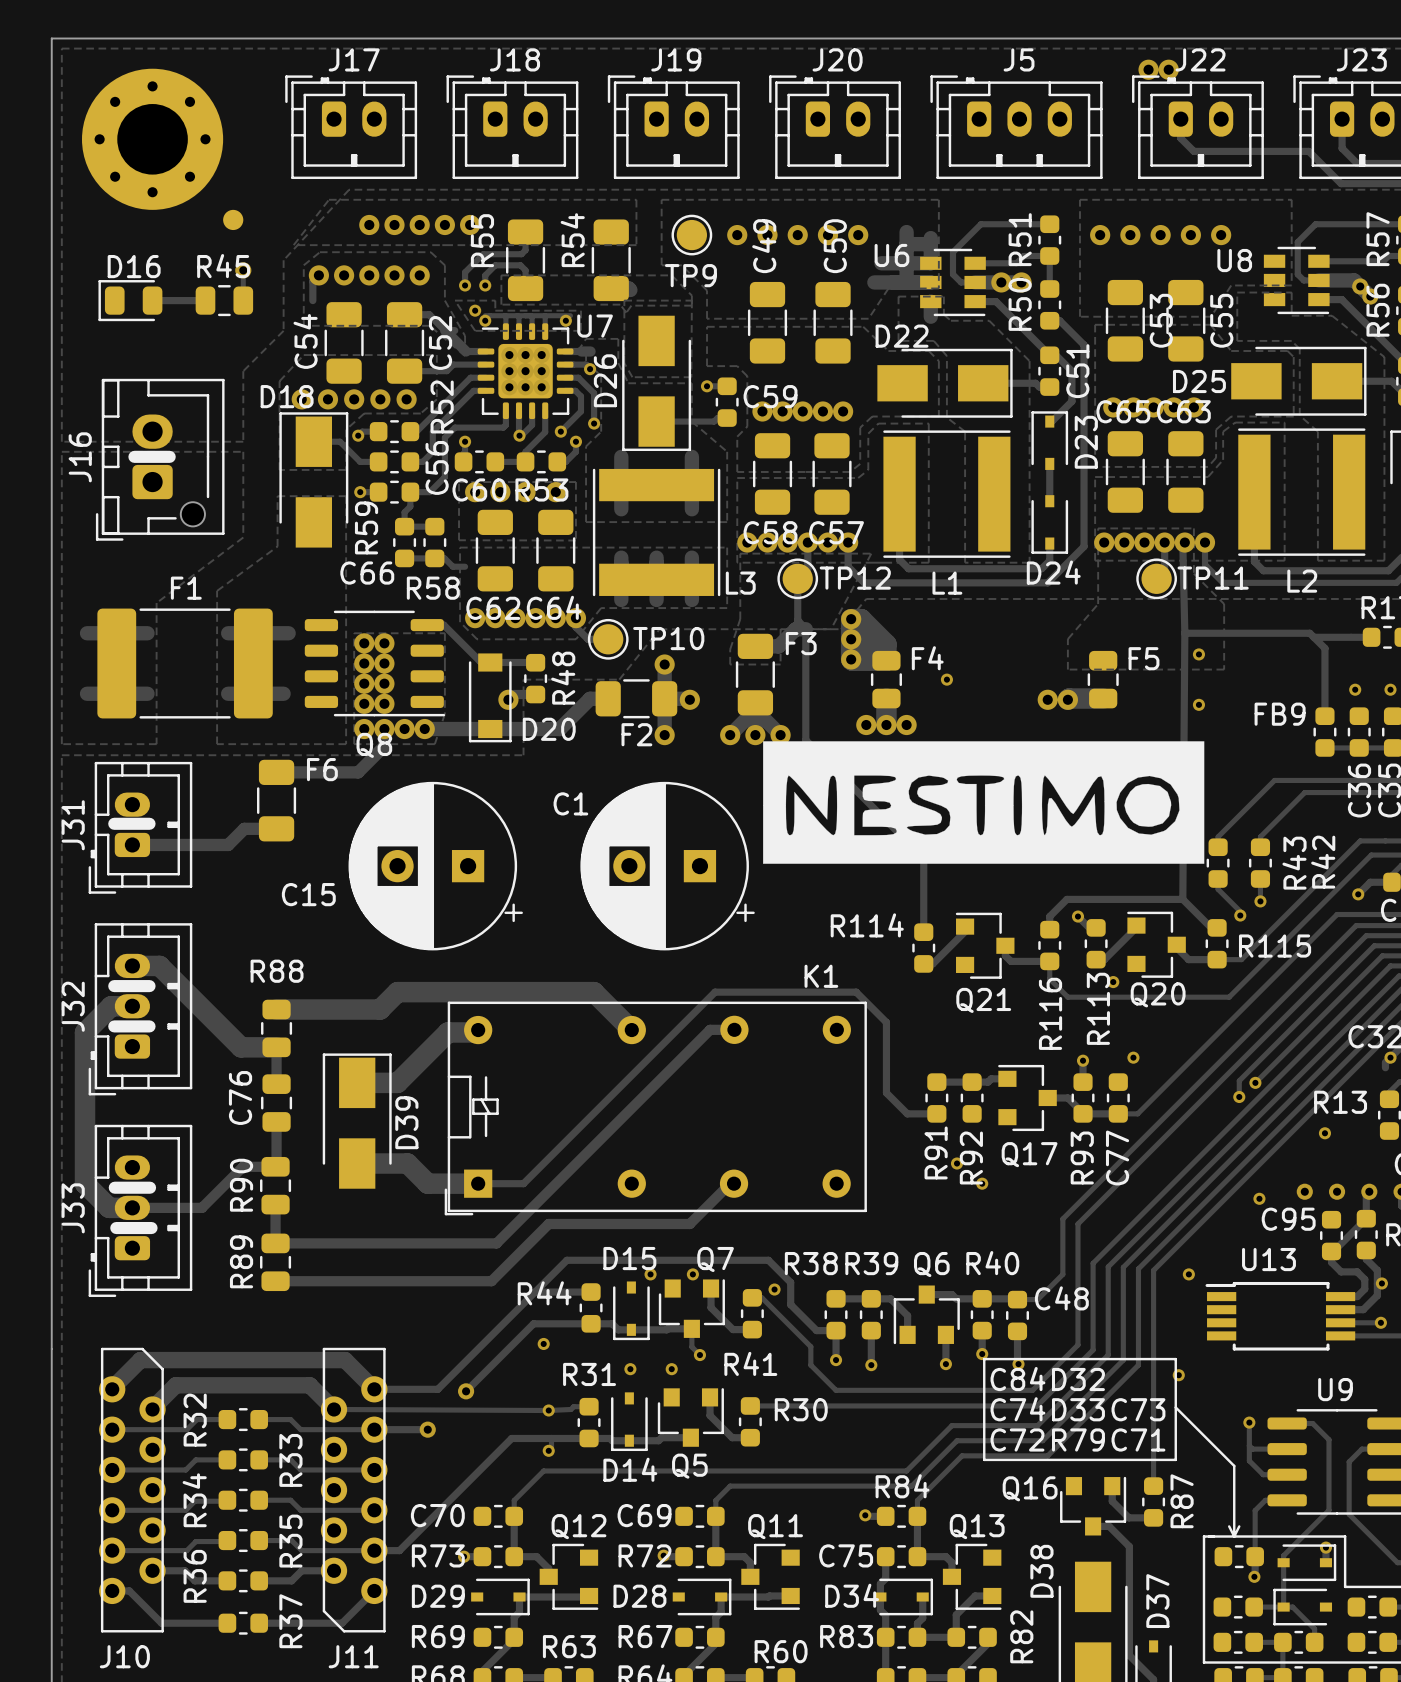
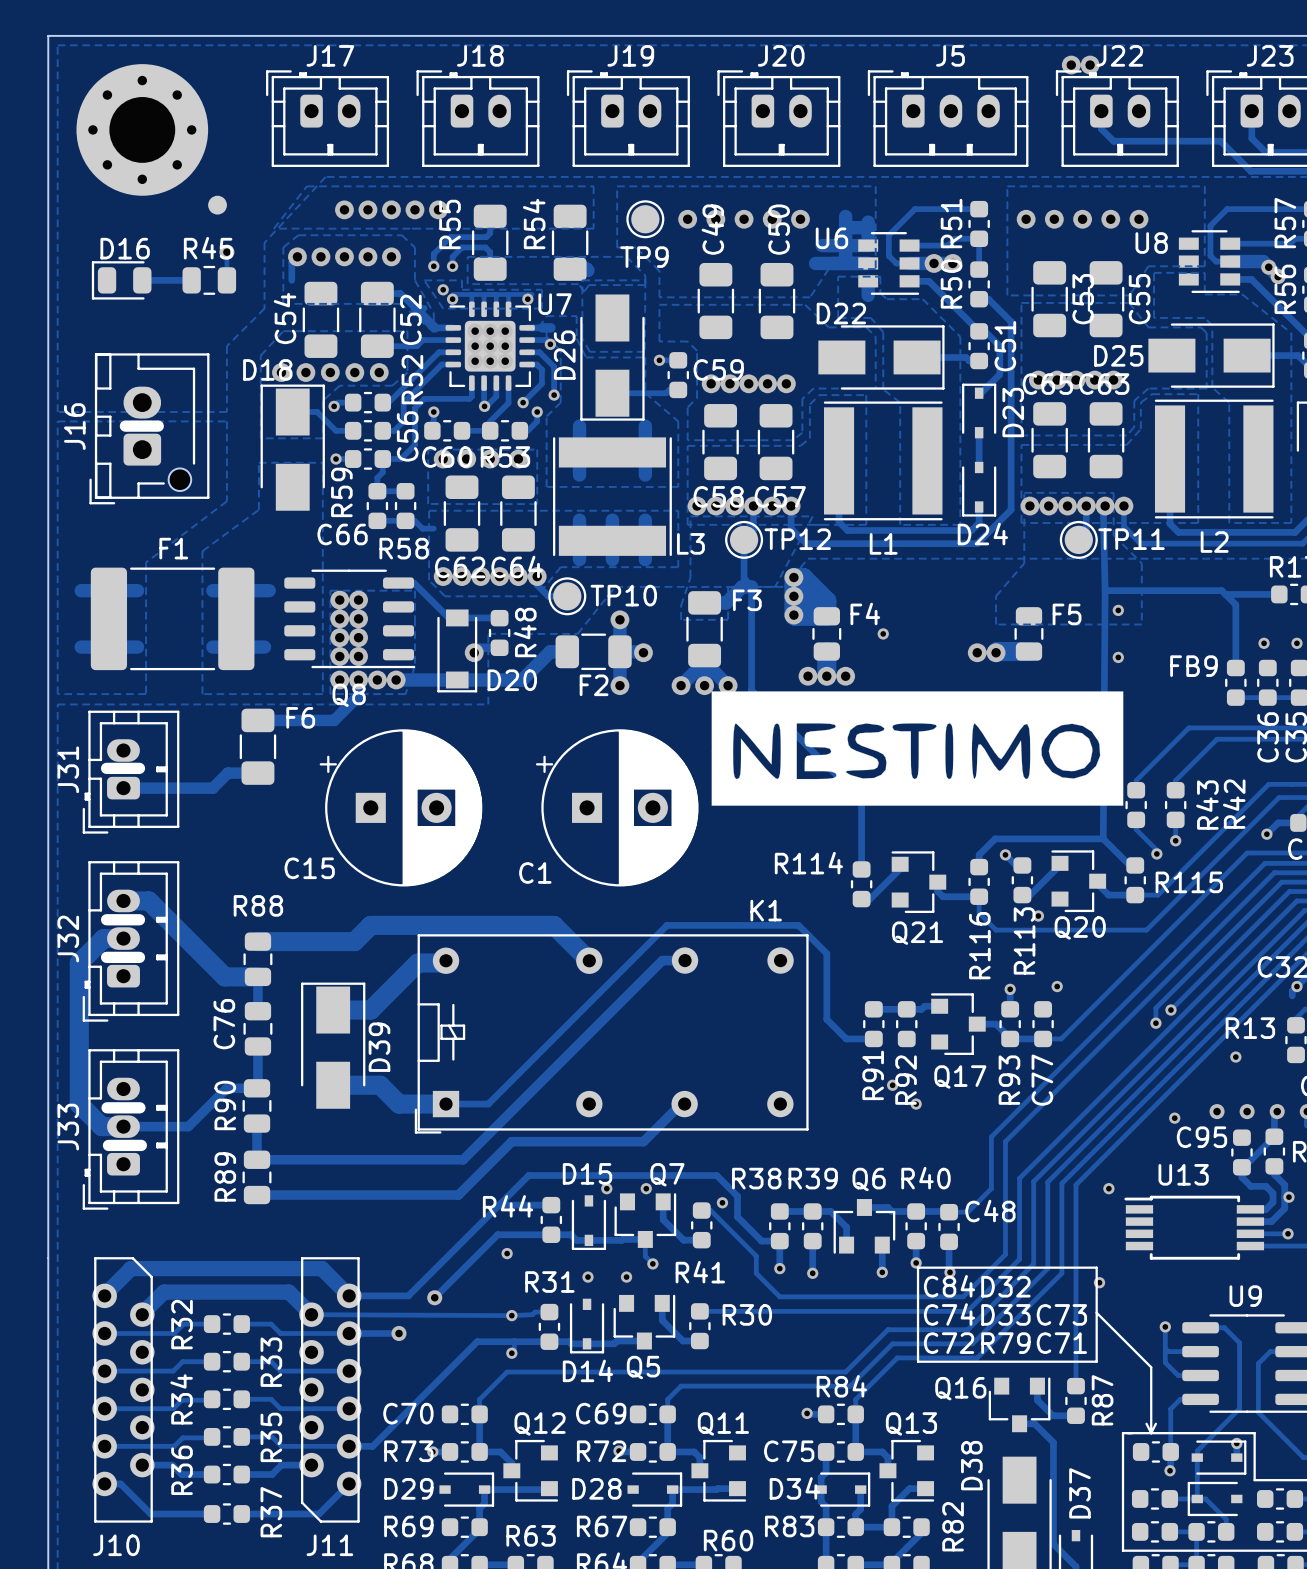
C1 name position: C1 (570, 803) -> C1 (535, 872)
C15 rotation: 0° (435, 866) -> 180° (400, 807)
C1 rotation: 0° (667, 866) -> 180° (617, 807)
C15 name position: C15 (308, 894) -> C15 (309, 868)

